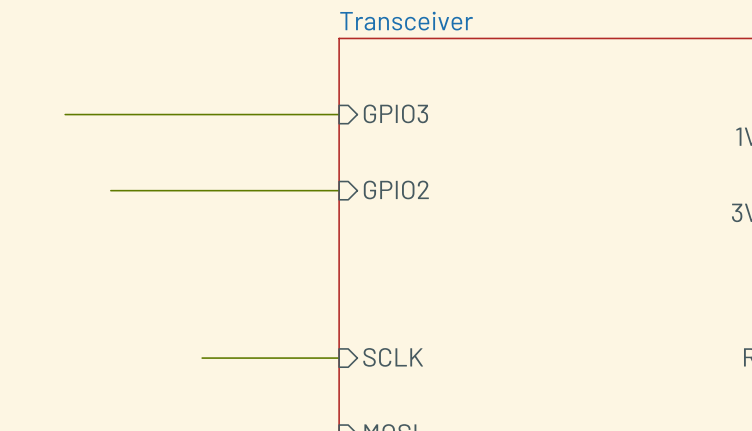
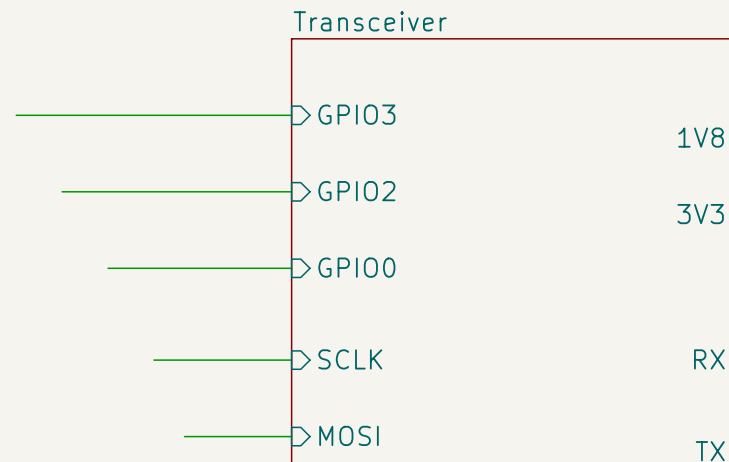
wire: none -> (108, 268) (291, 268)
sheet pin: none -> GPIO0 (356, 267)

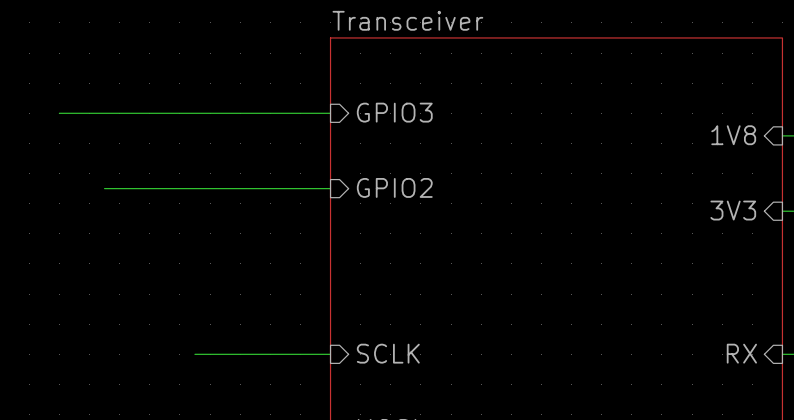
sheet pin: GPIO0 (356, 267) -> none
wire: (108, 268) (291, 268) -> none

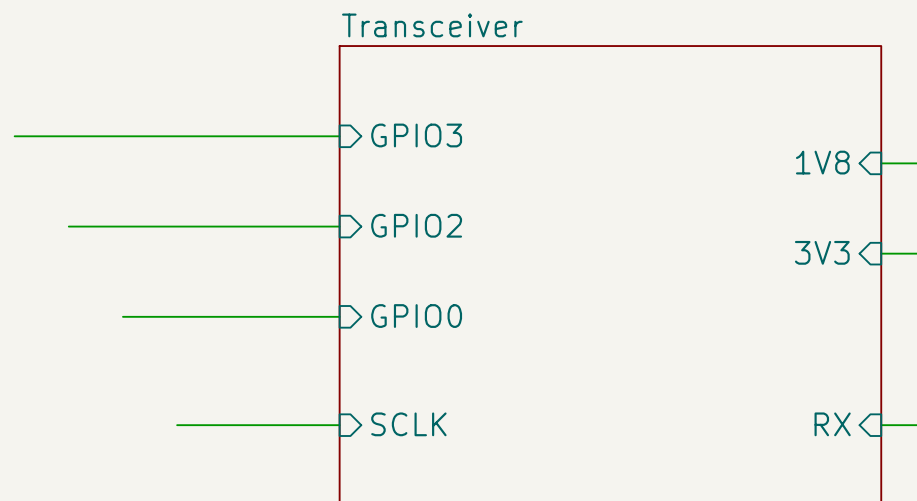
wire: none -> (122, 316) (339, 316)
sheet pin: none -> GPIO0 (416, 316)

